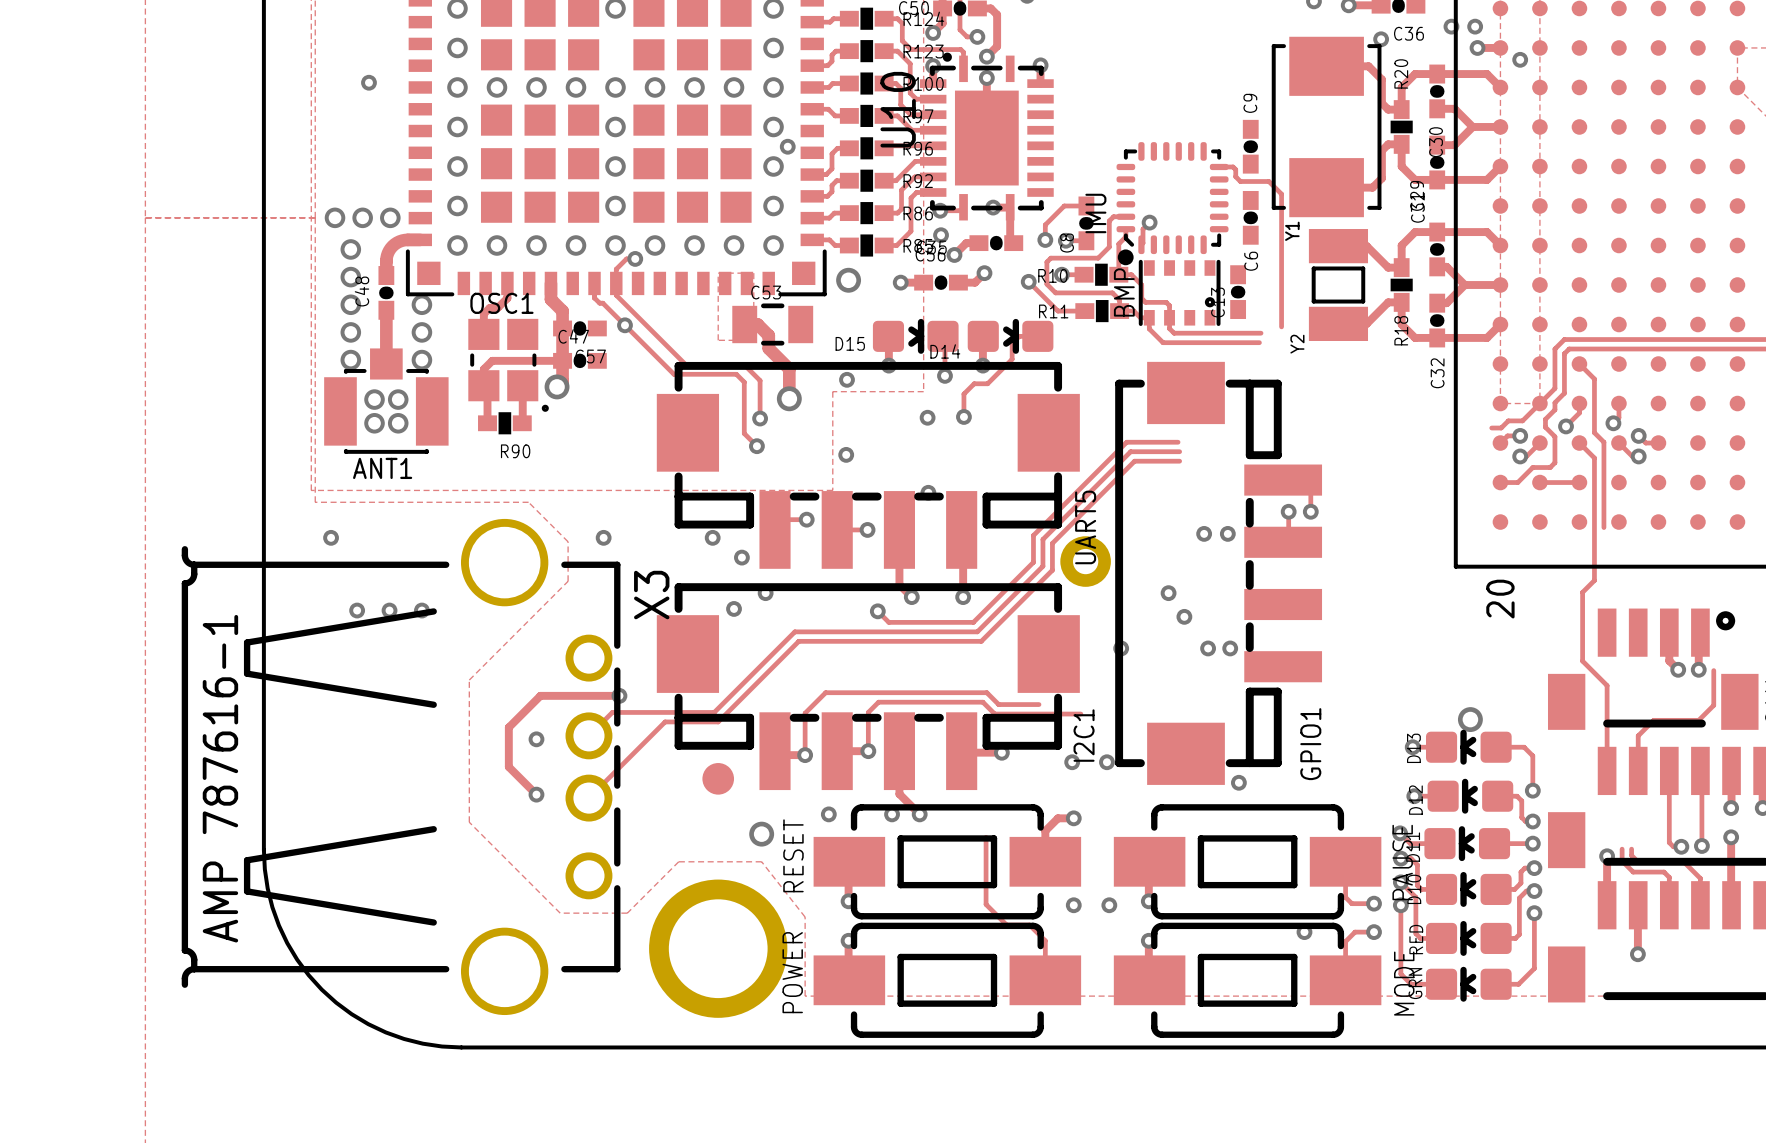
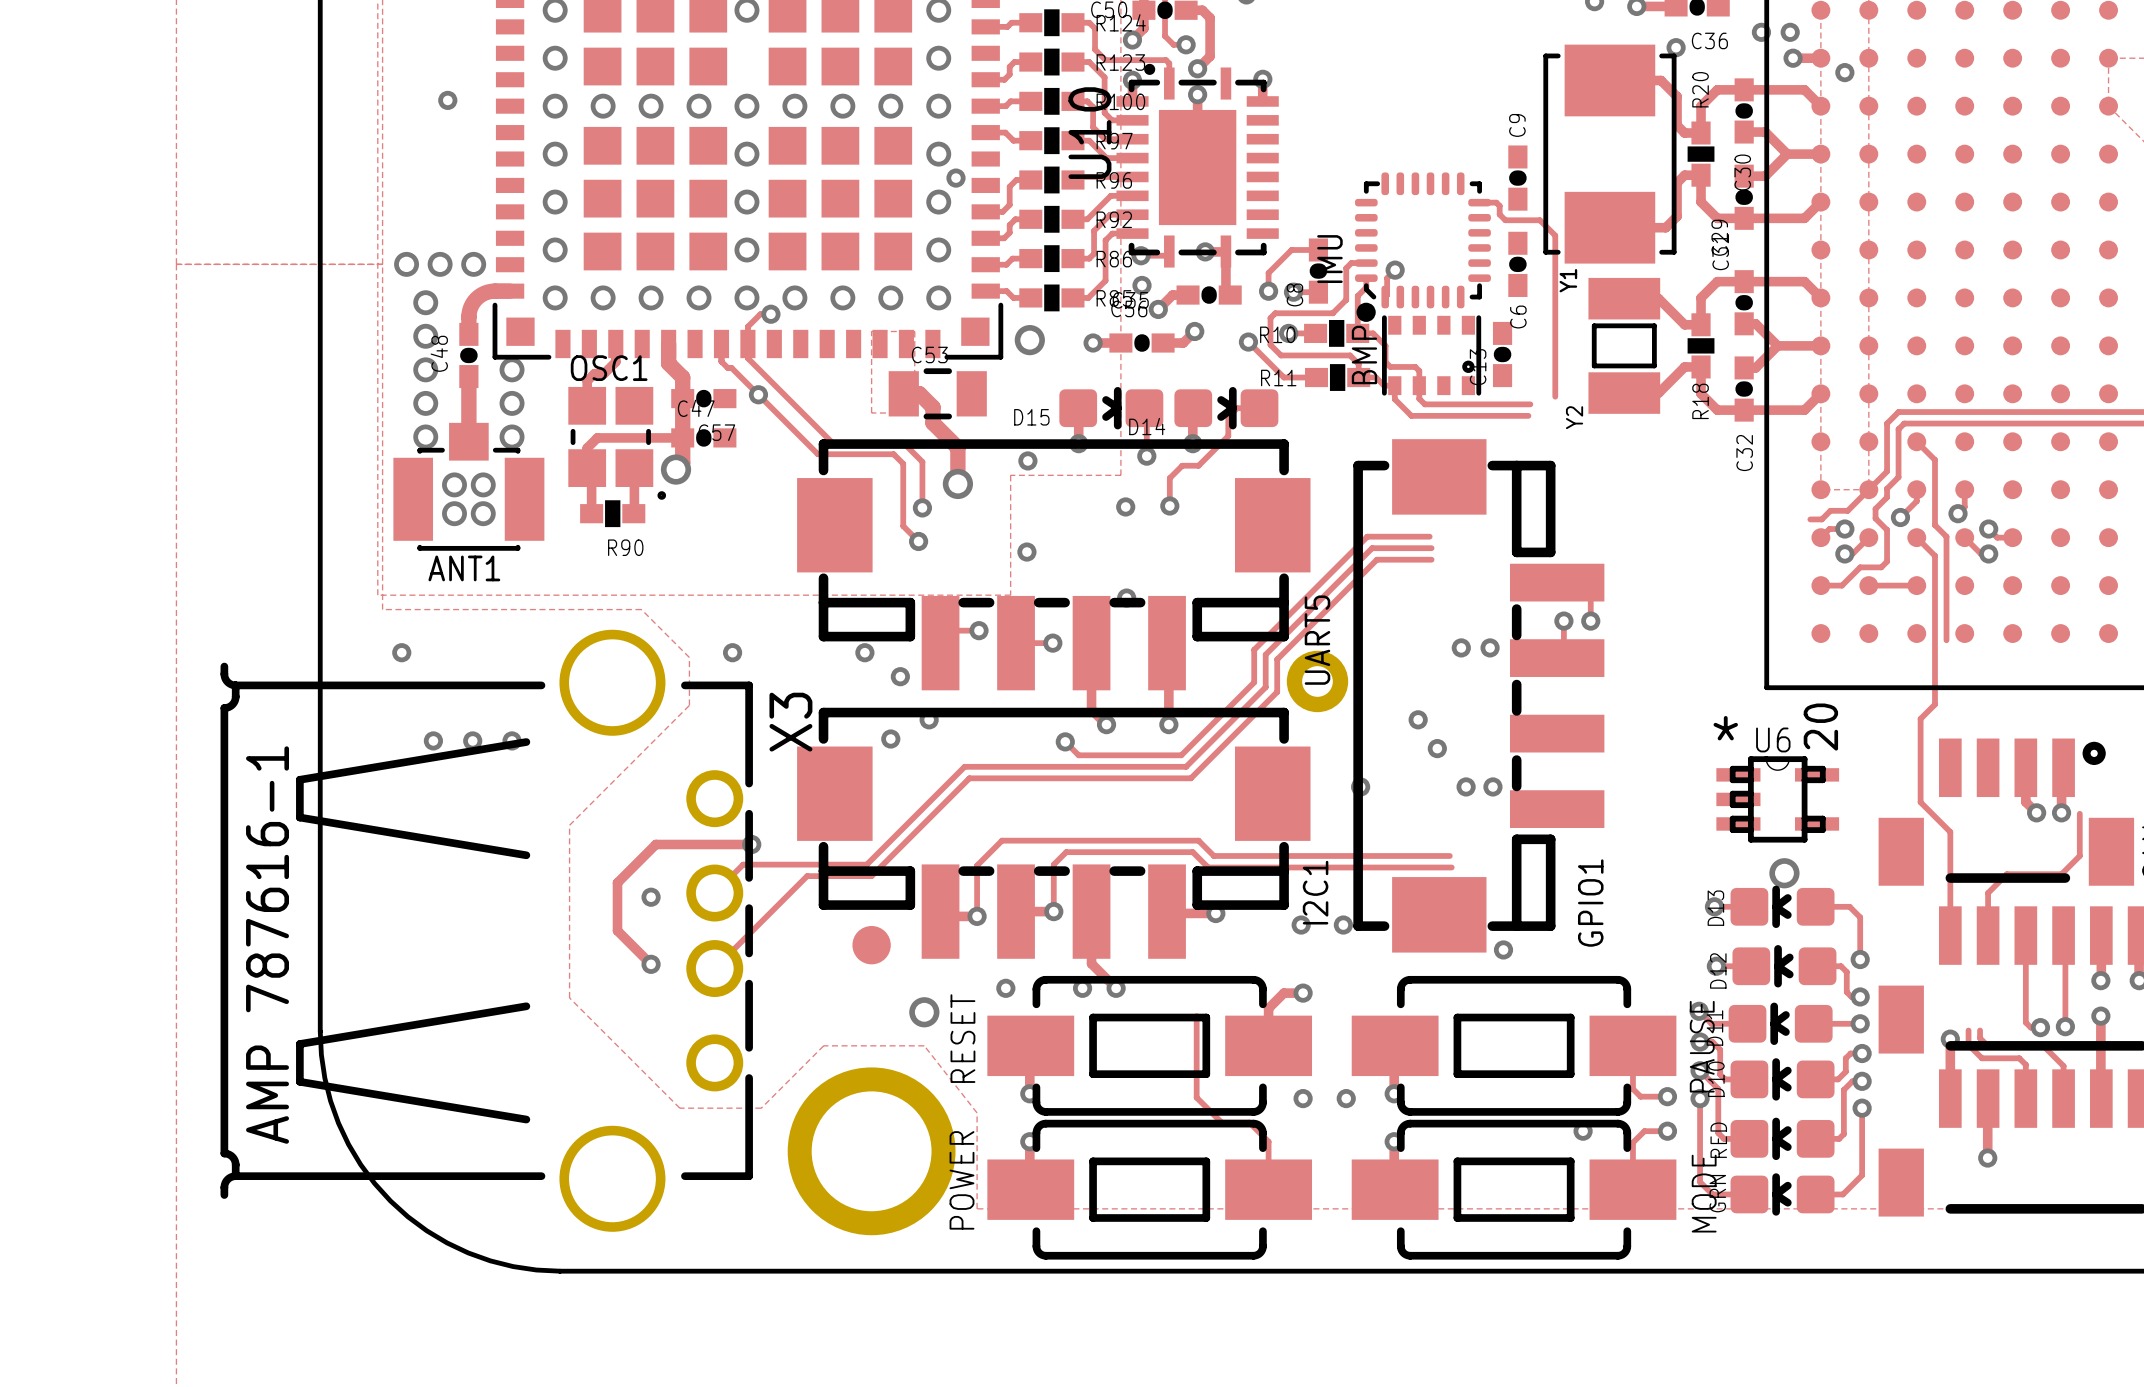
U6: none -> (1777, 799)
track: (986, 692) (998, 704) (1039, 704) -> (1197, 840) (1213, 855) (1449, 855)
track: (994, 714) (1080, 714) -> (1207, 866) (1451, 867)

